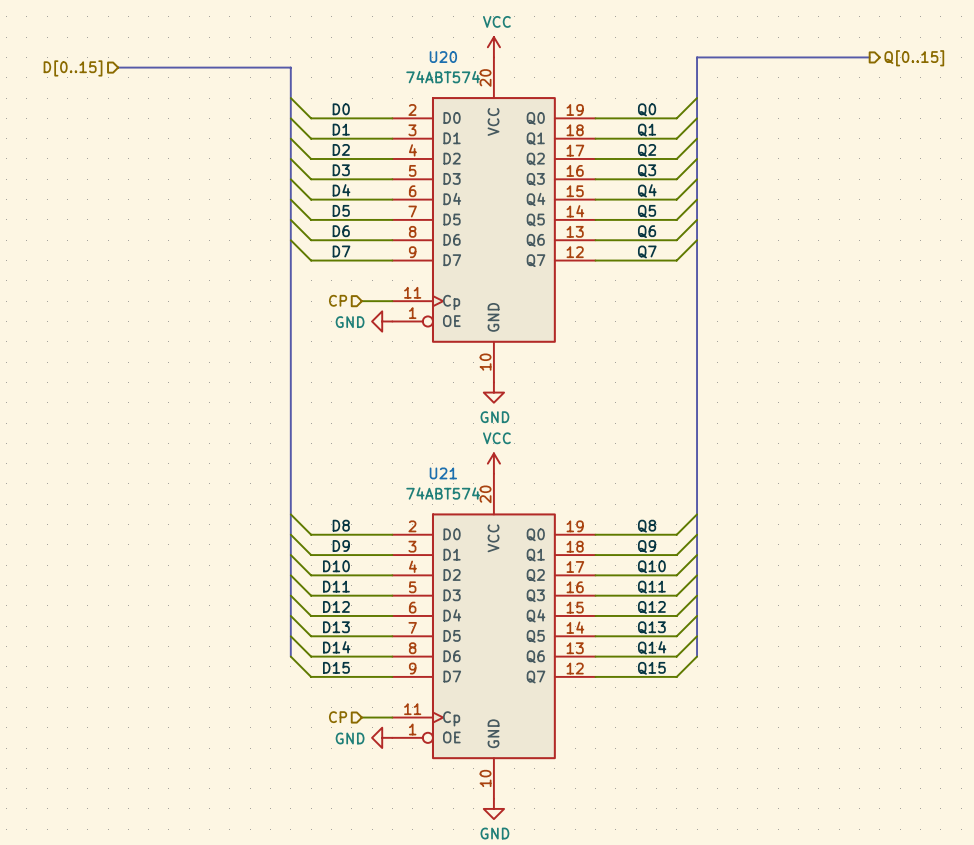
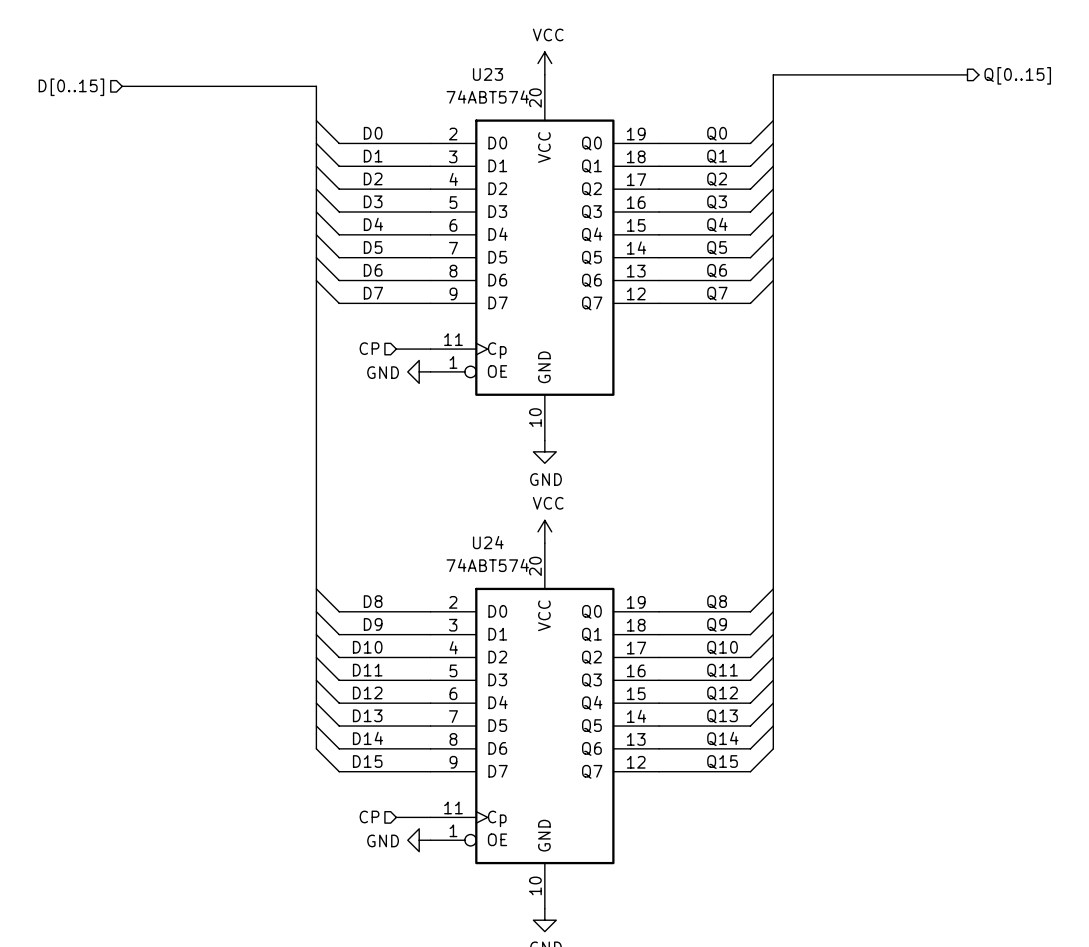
U20 name: U20 (443, 57) -> U23 (488, 74)
U21 name: U21 (443, 473) -> U24 (488, 542)

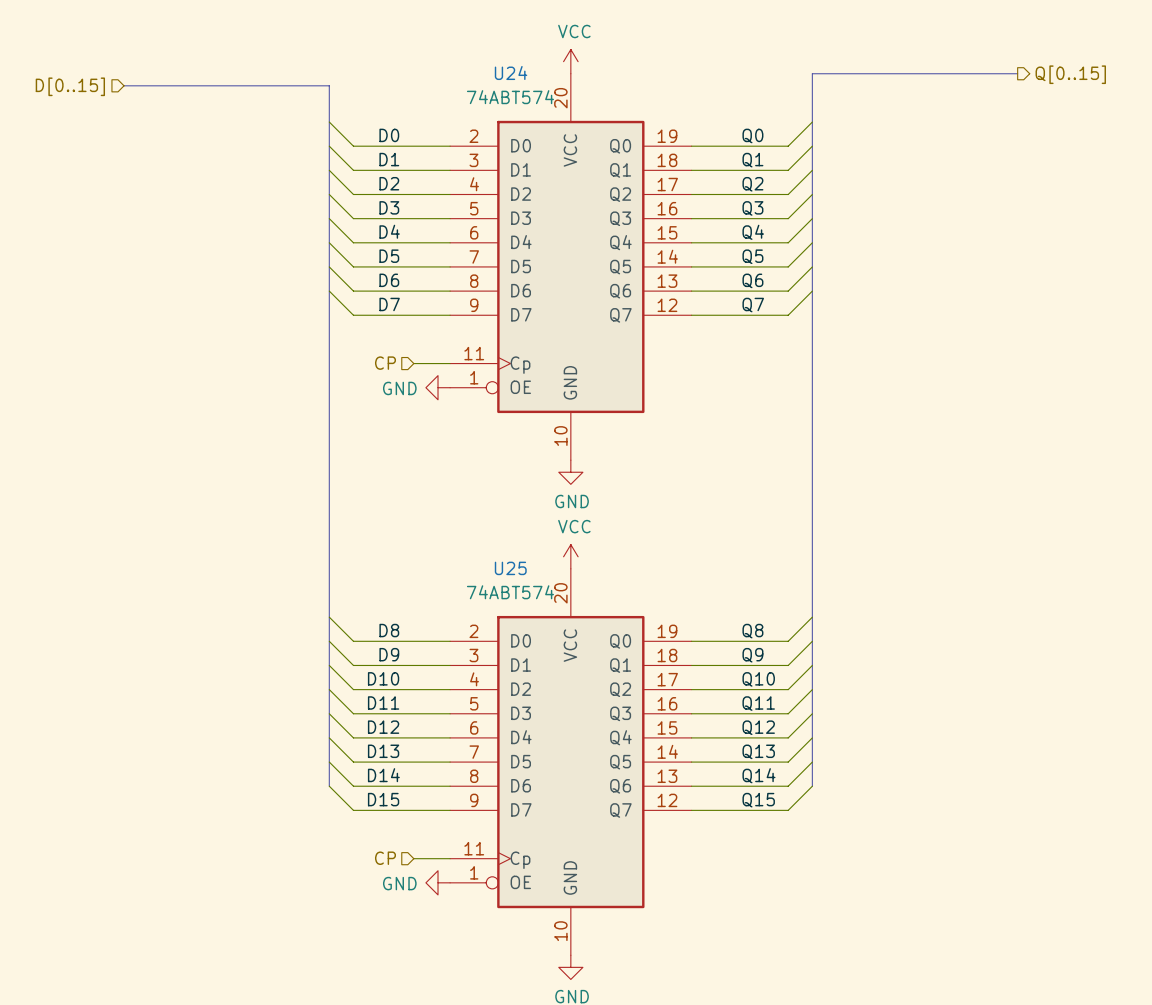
U23 name: U23 (488, 74) -> U24 (511, 72)
U24 name: U24 (488, 542) -> U25 (510, 568)

